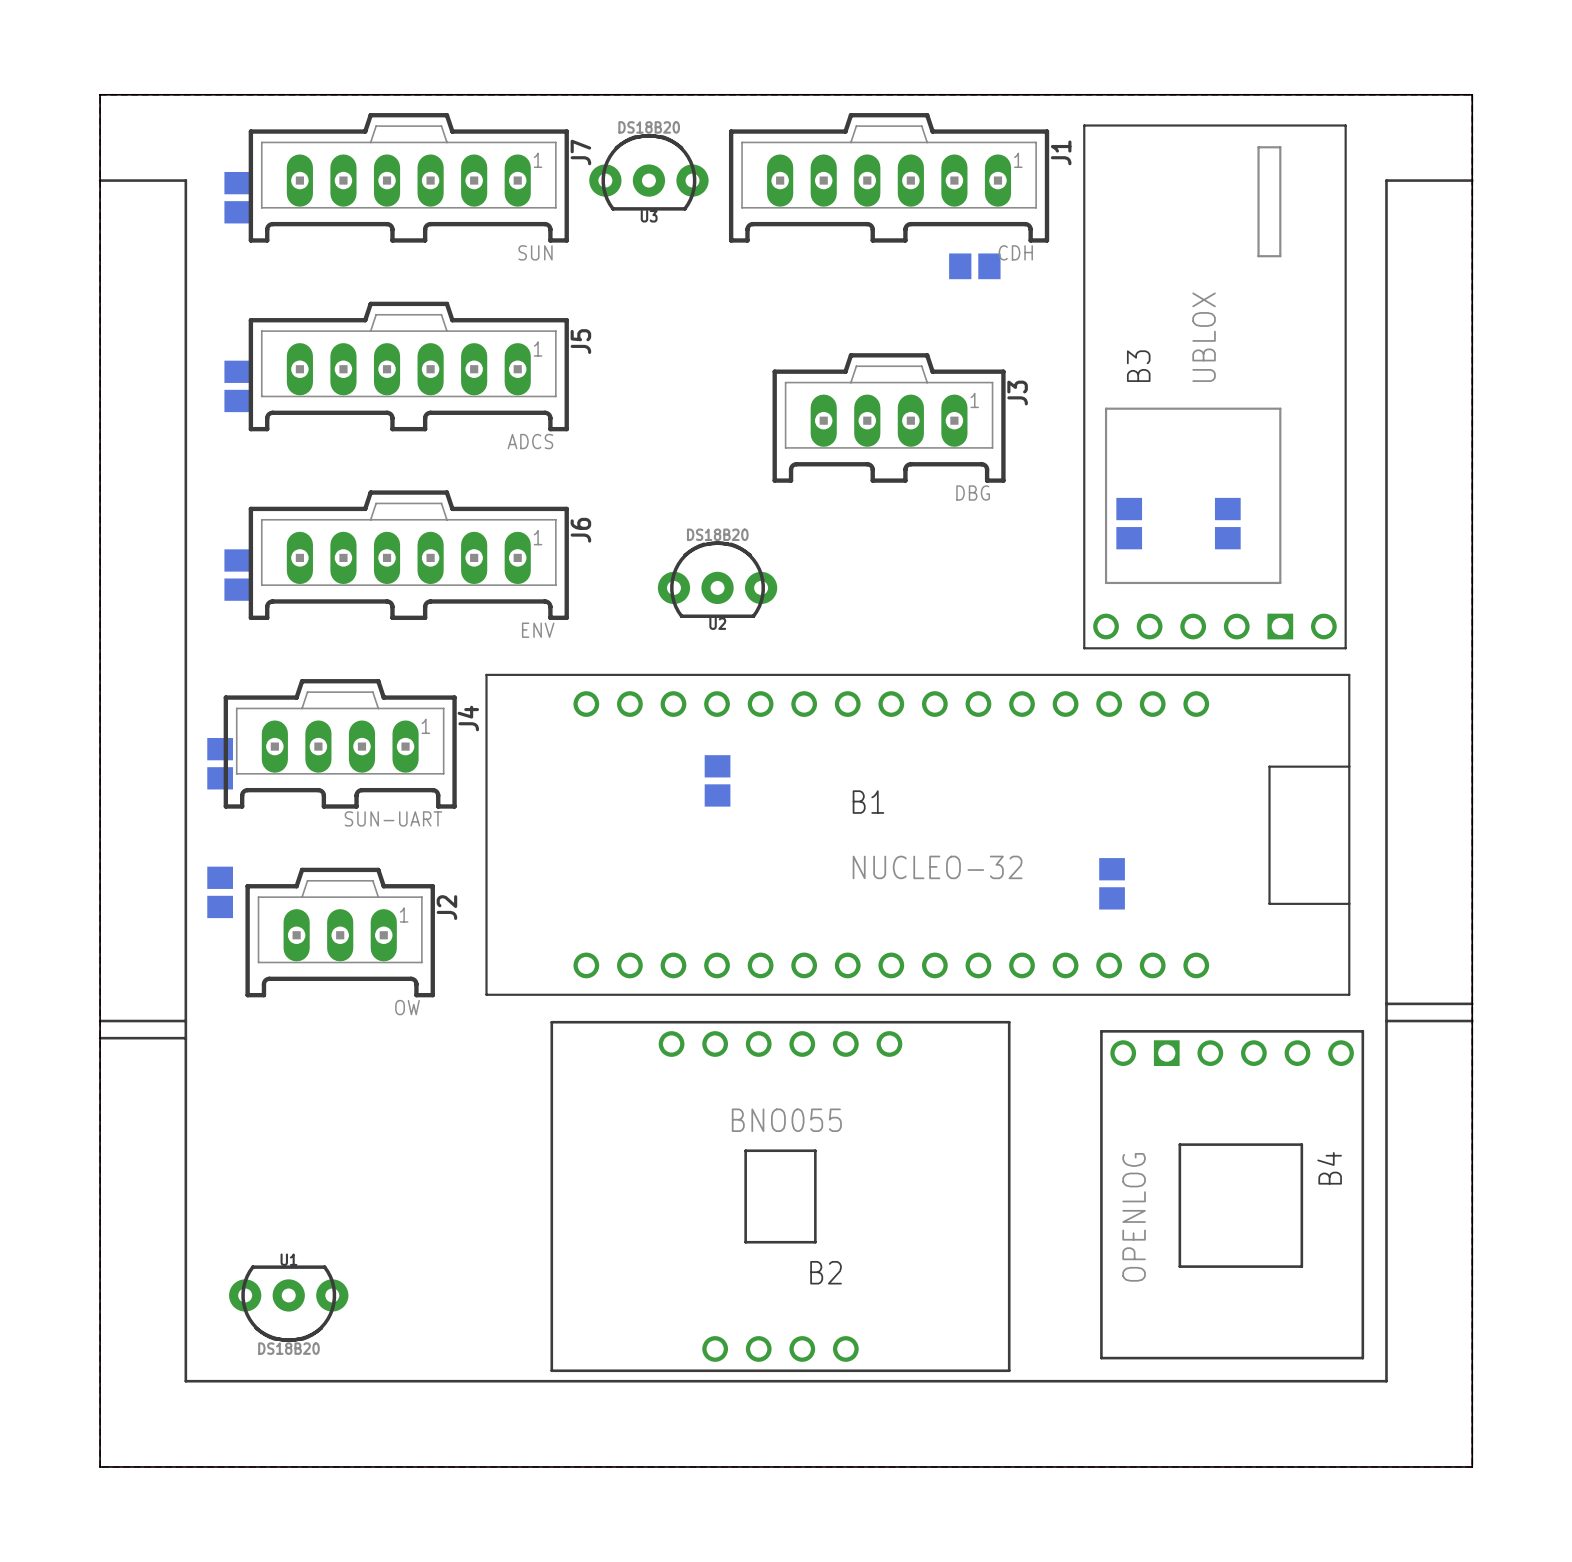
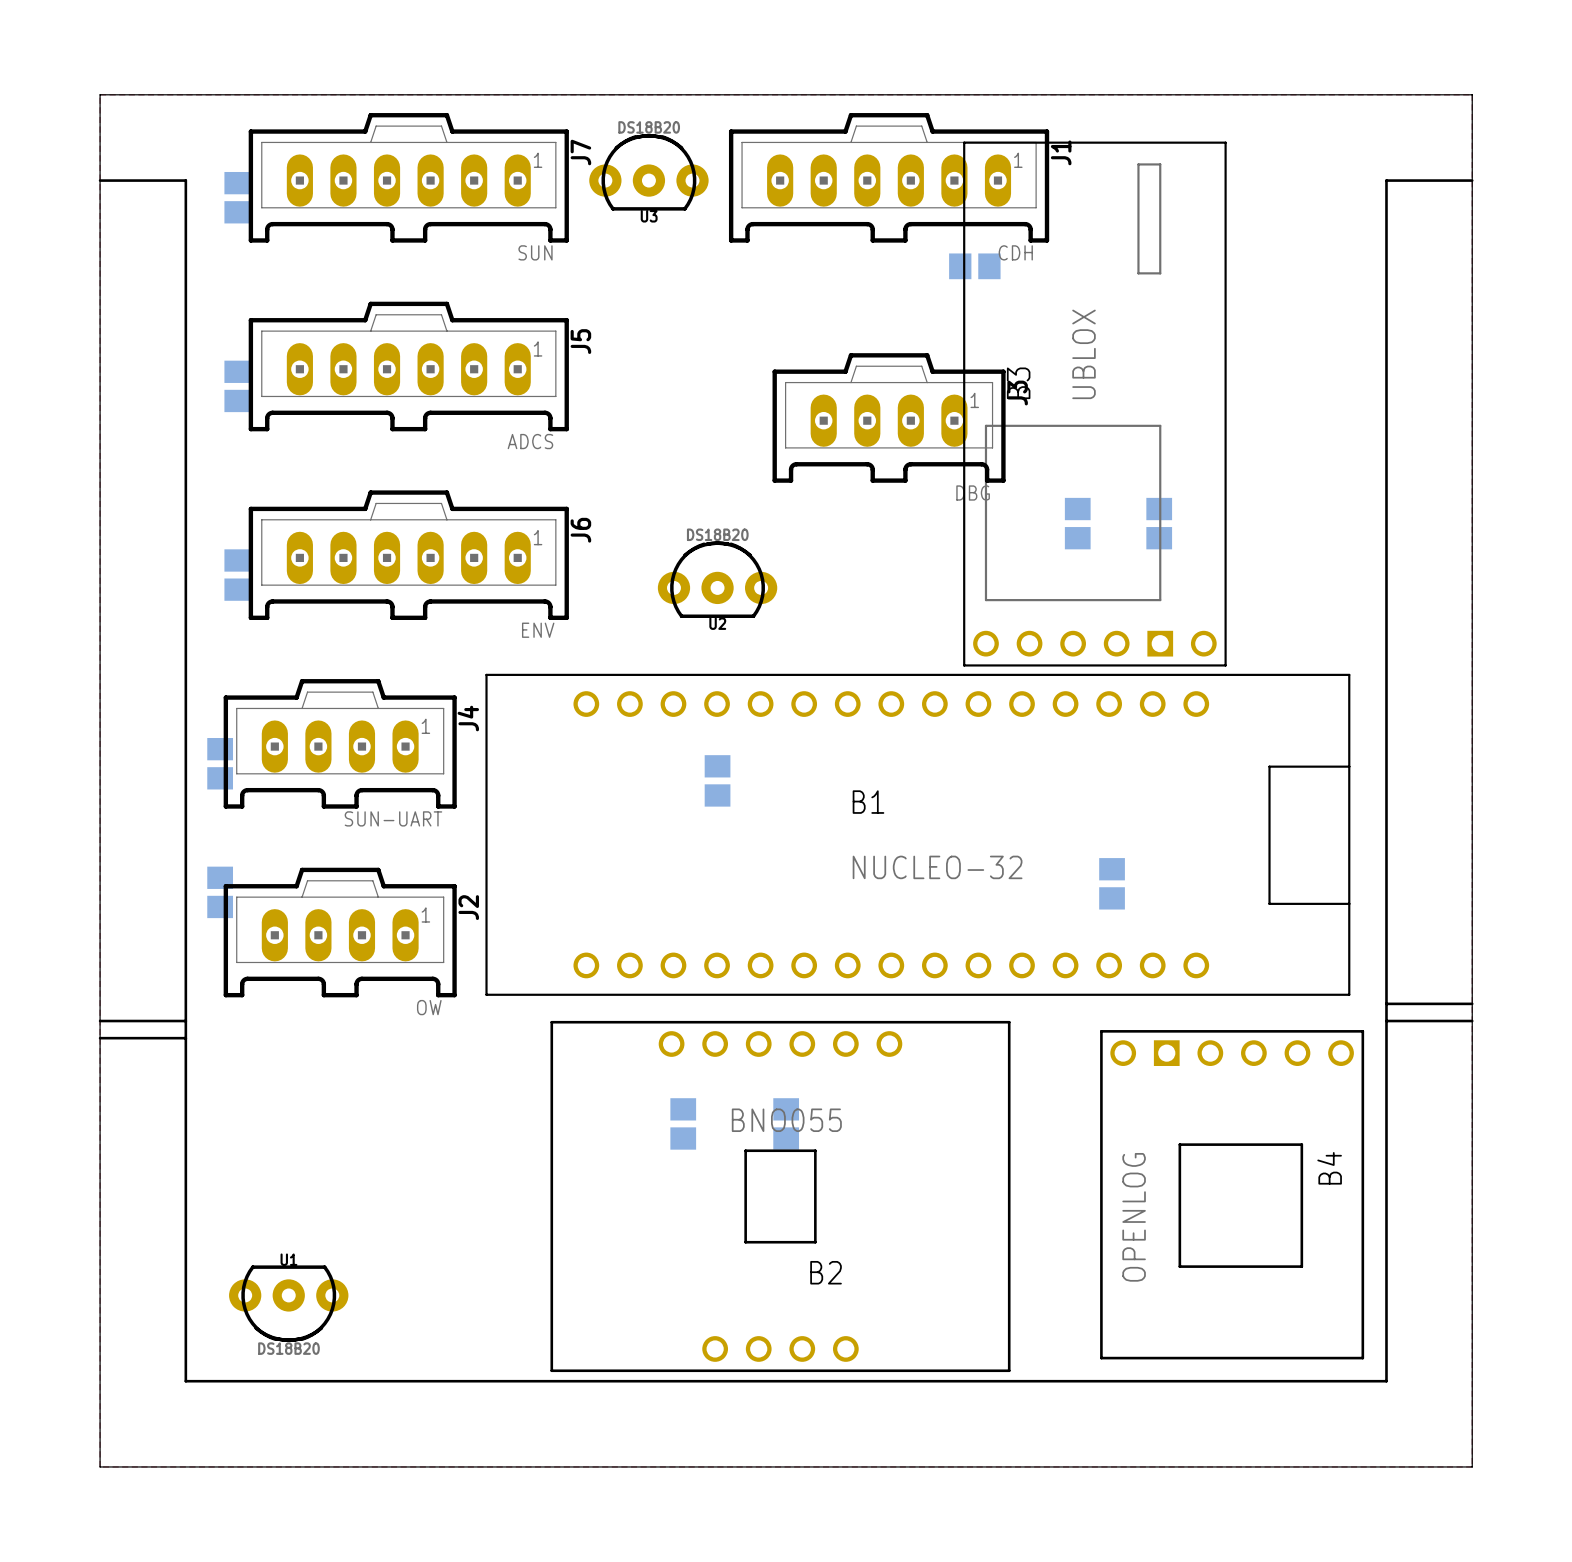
B3 position: (1214, 386) -> (1094, 404)
part: none -> (1077, 523)
part: (1129, 523) -> none
part: none -> (1159, 523)
part: (1227, 523) -> none
J2 footprint: [245, 867, 435, 998] -> [223, 867, 457, 998]
part: none -> (683, 1123)
part: none -> (786, 1123)

